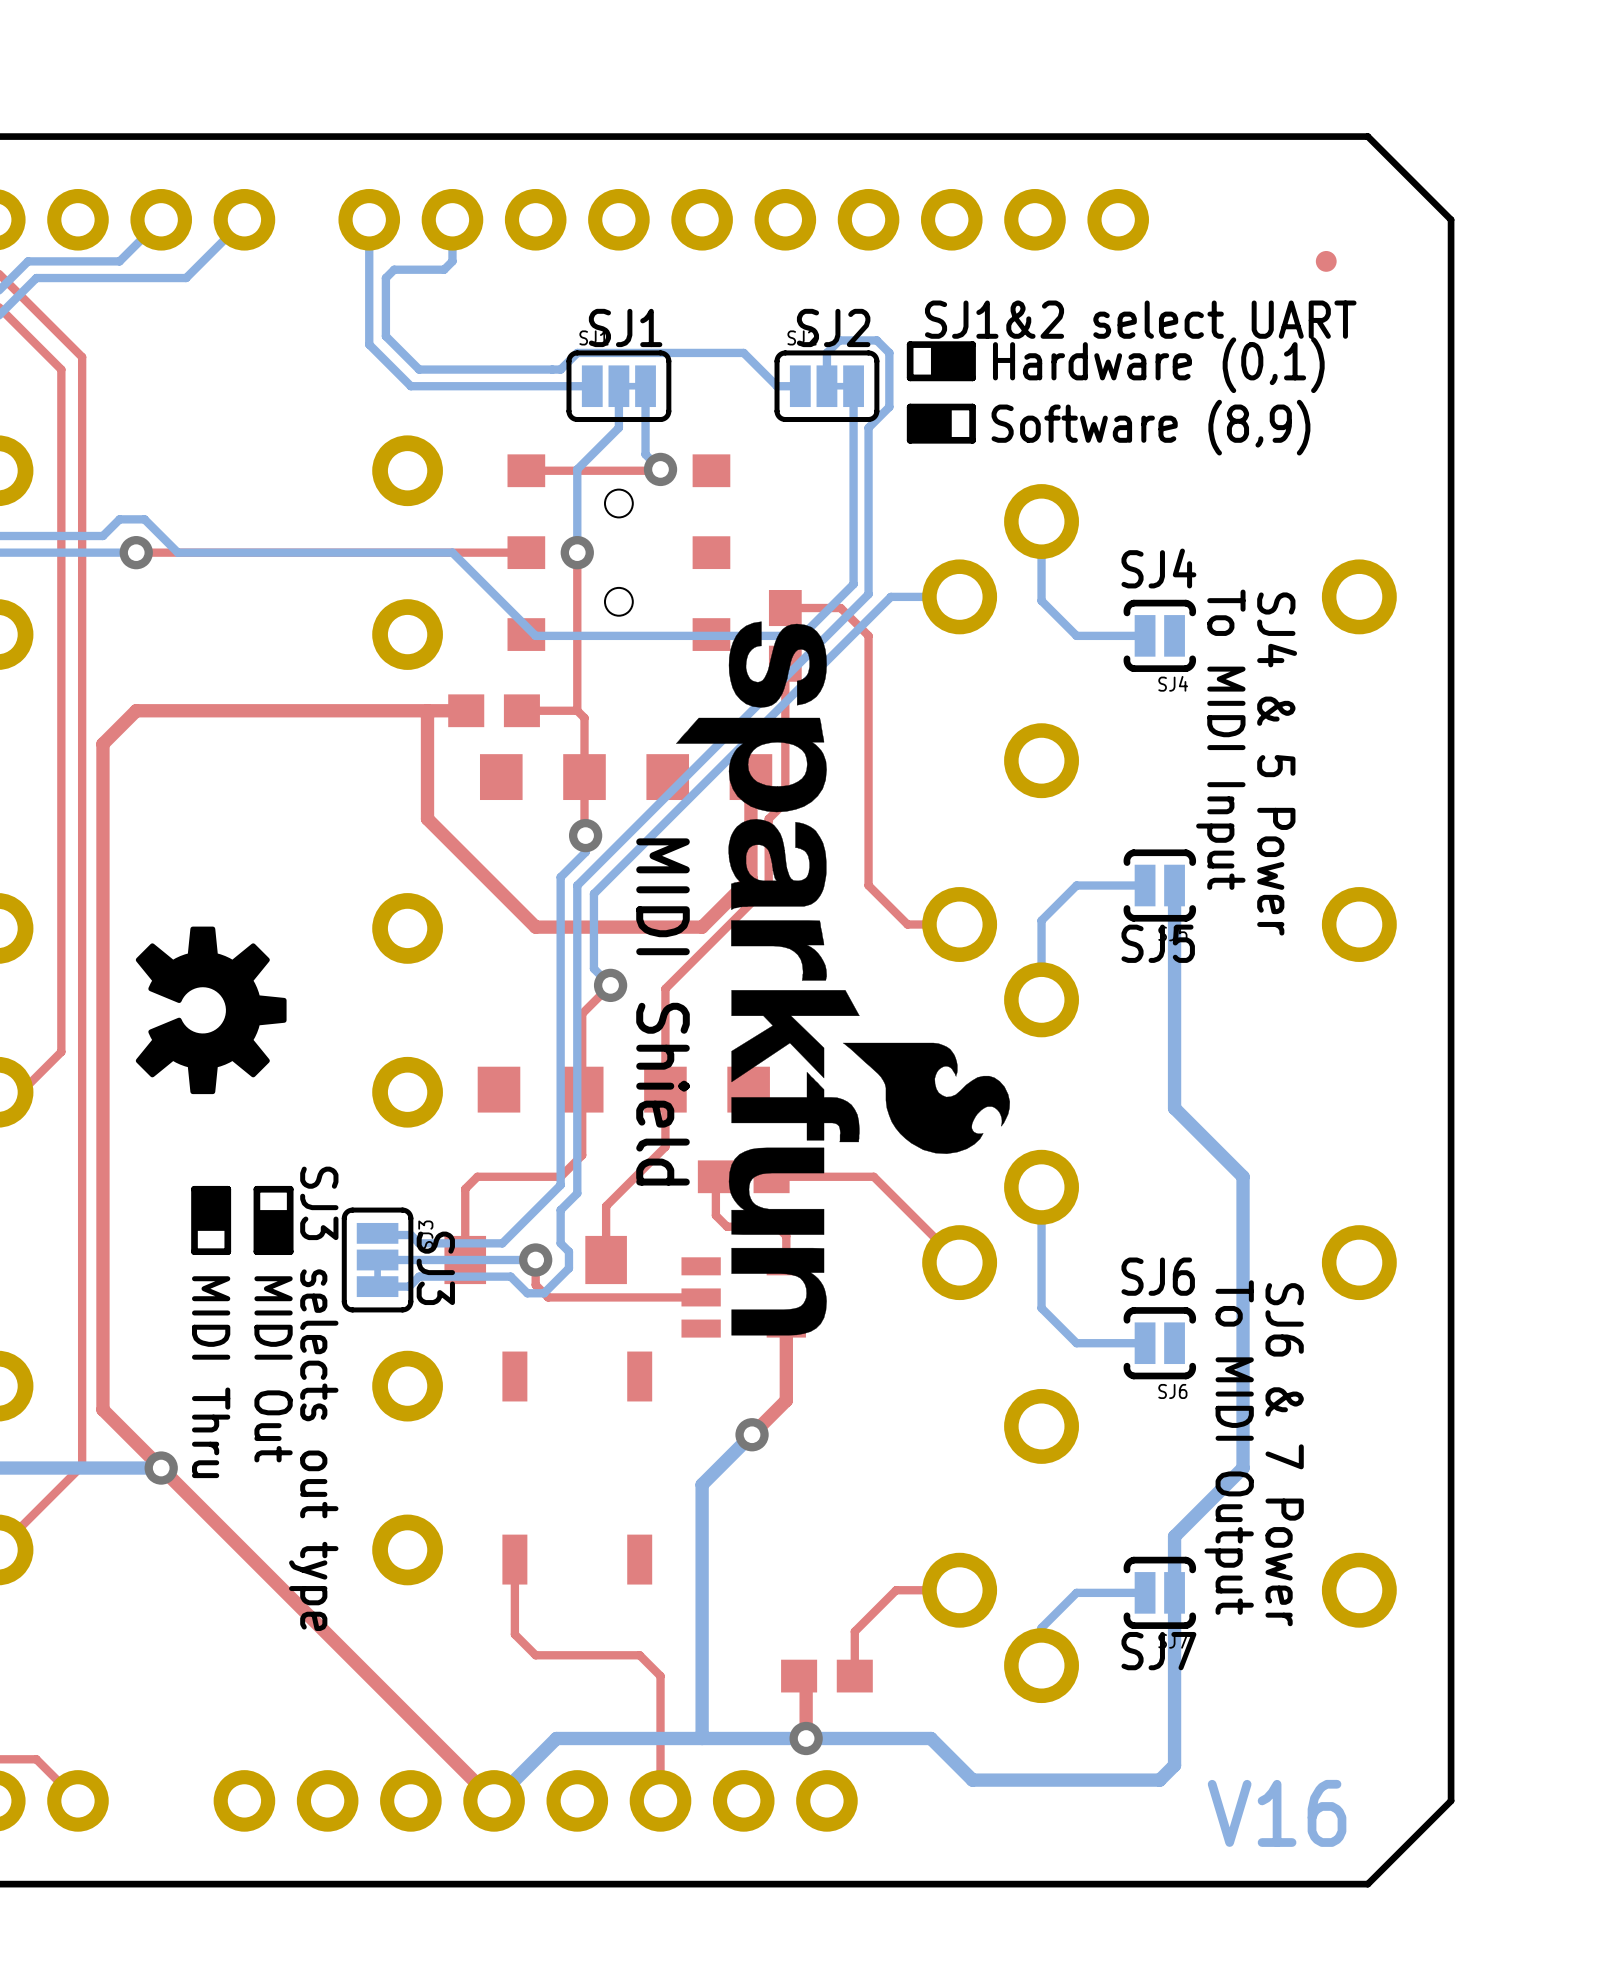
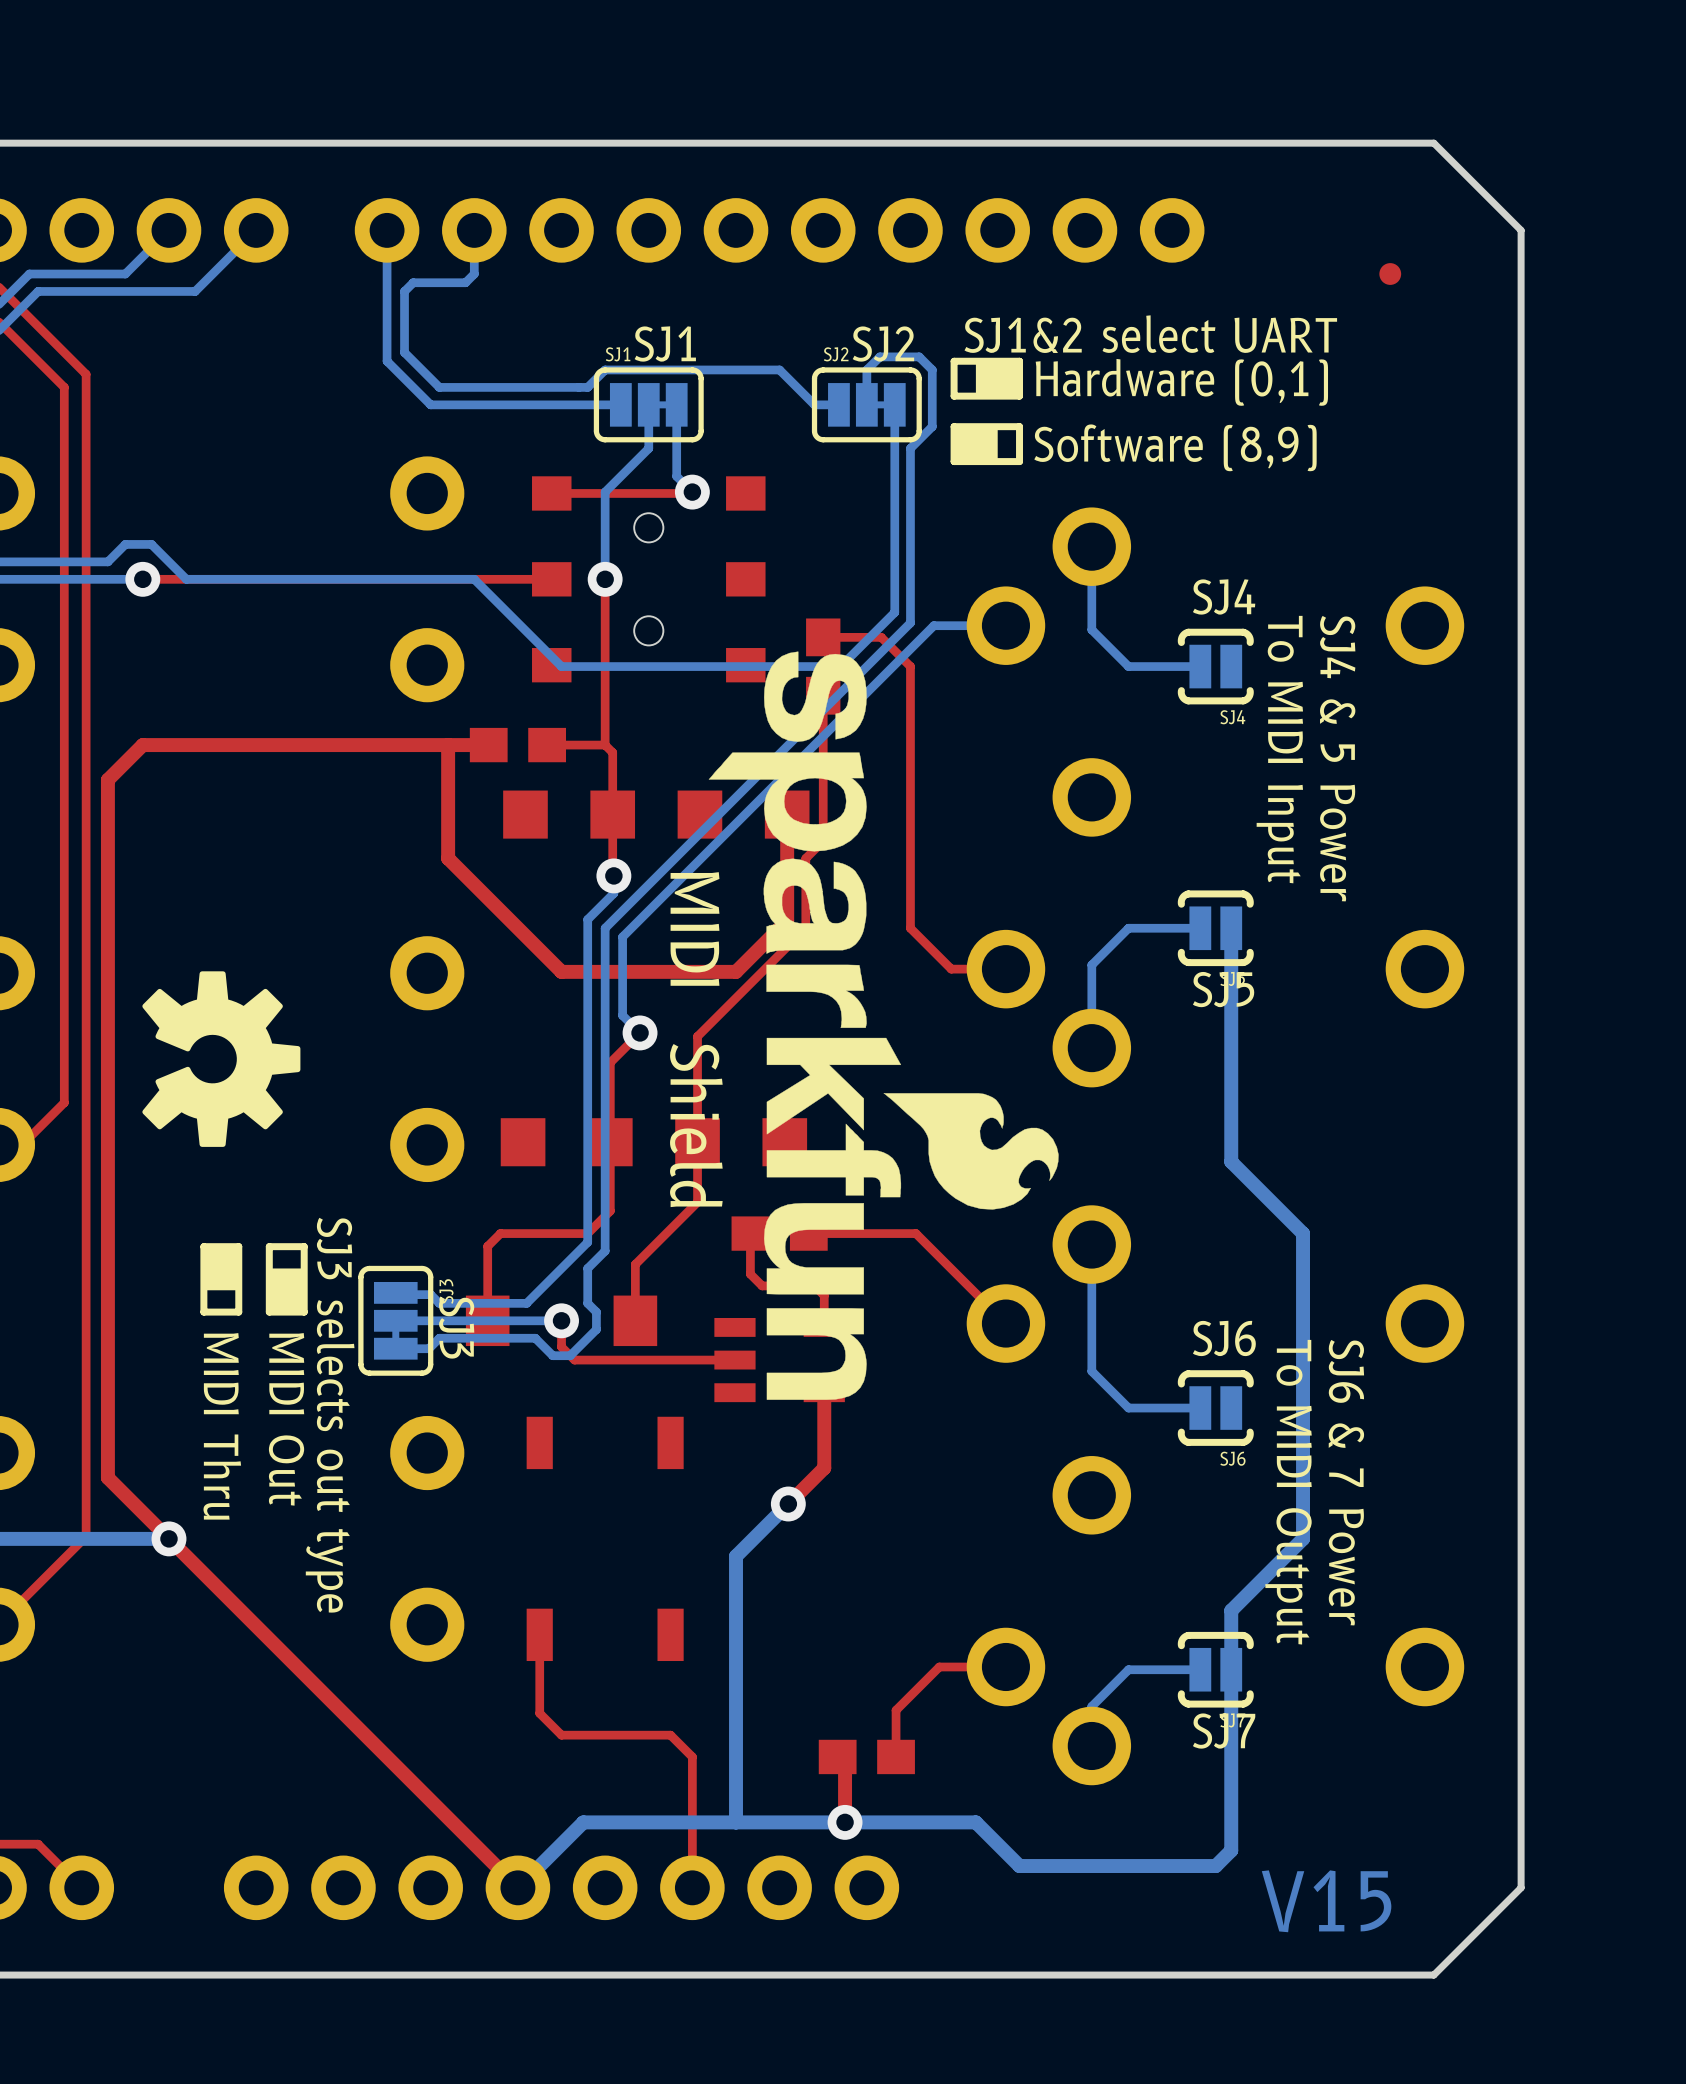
text: V16 (1277, 1813) -> V15 (1326, 1901)

